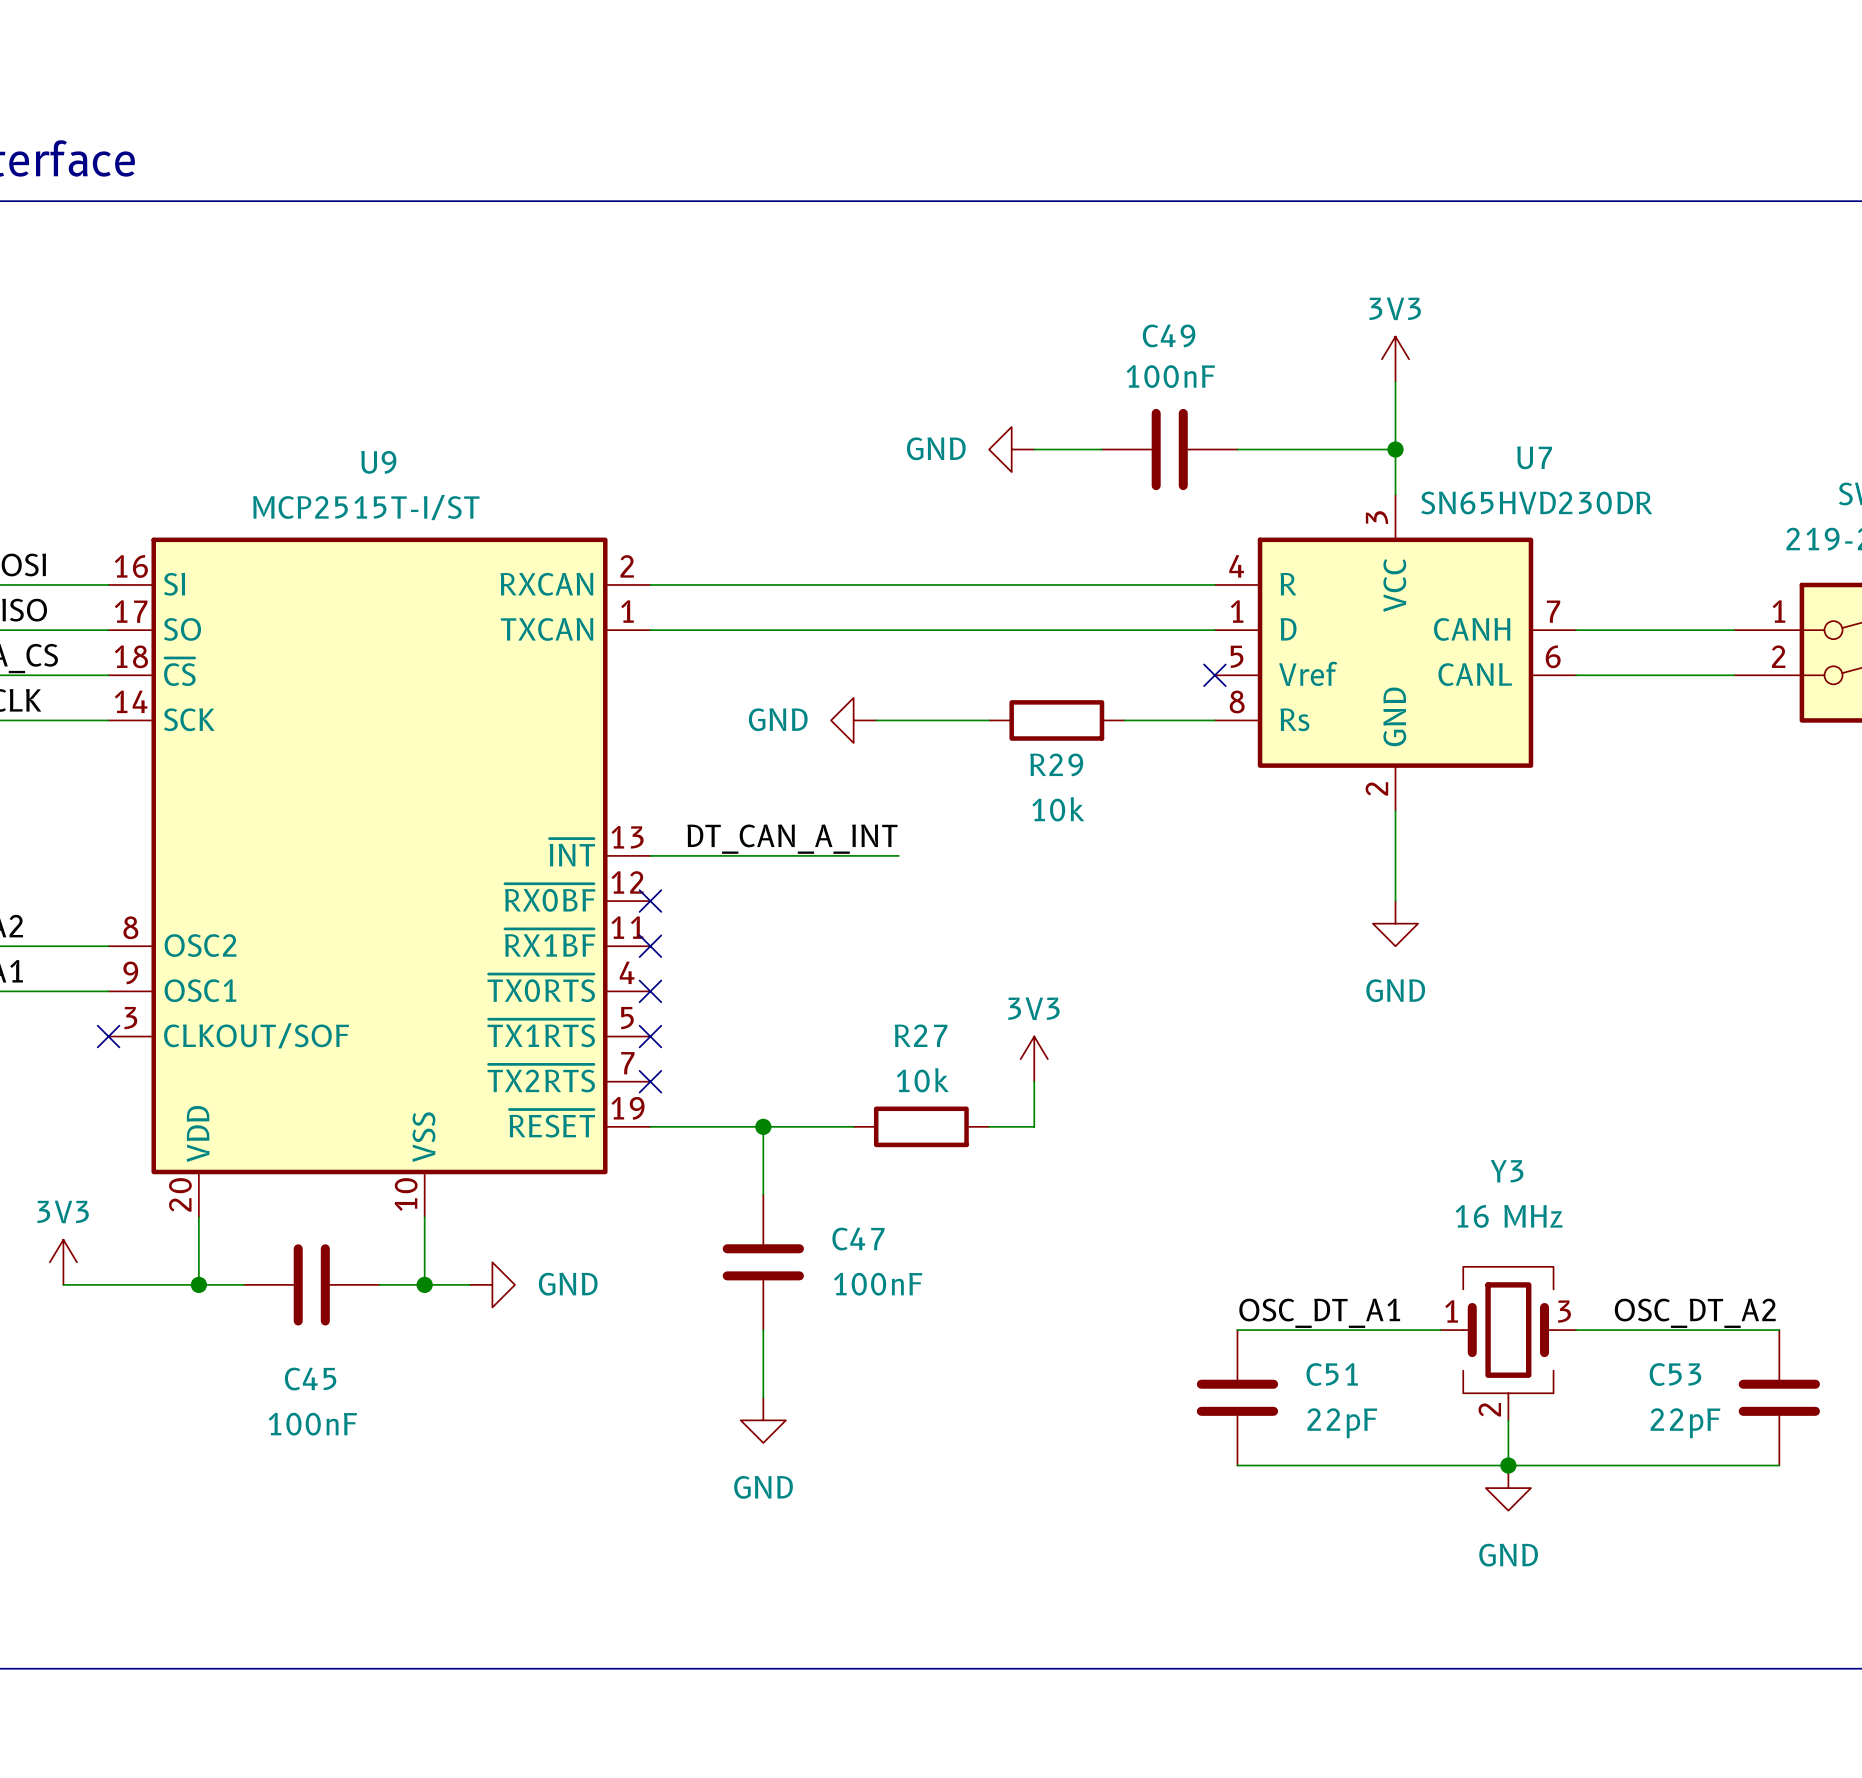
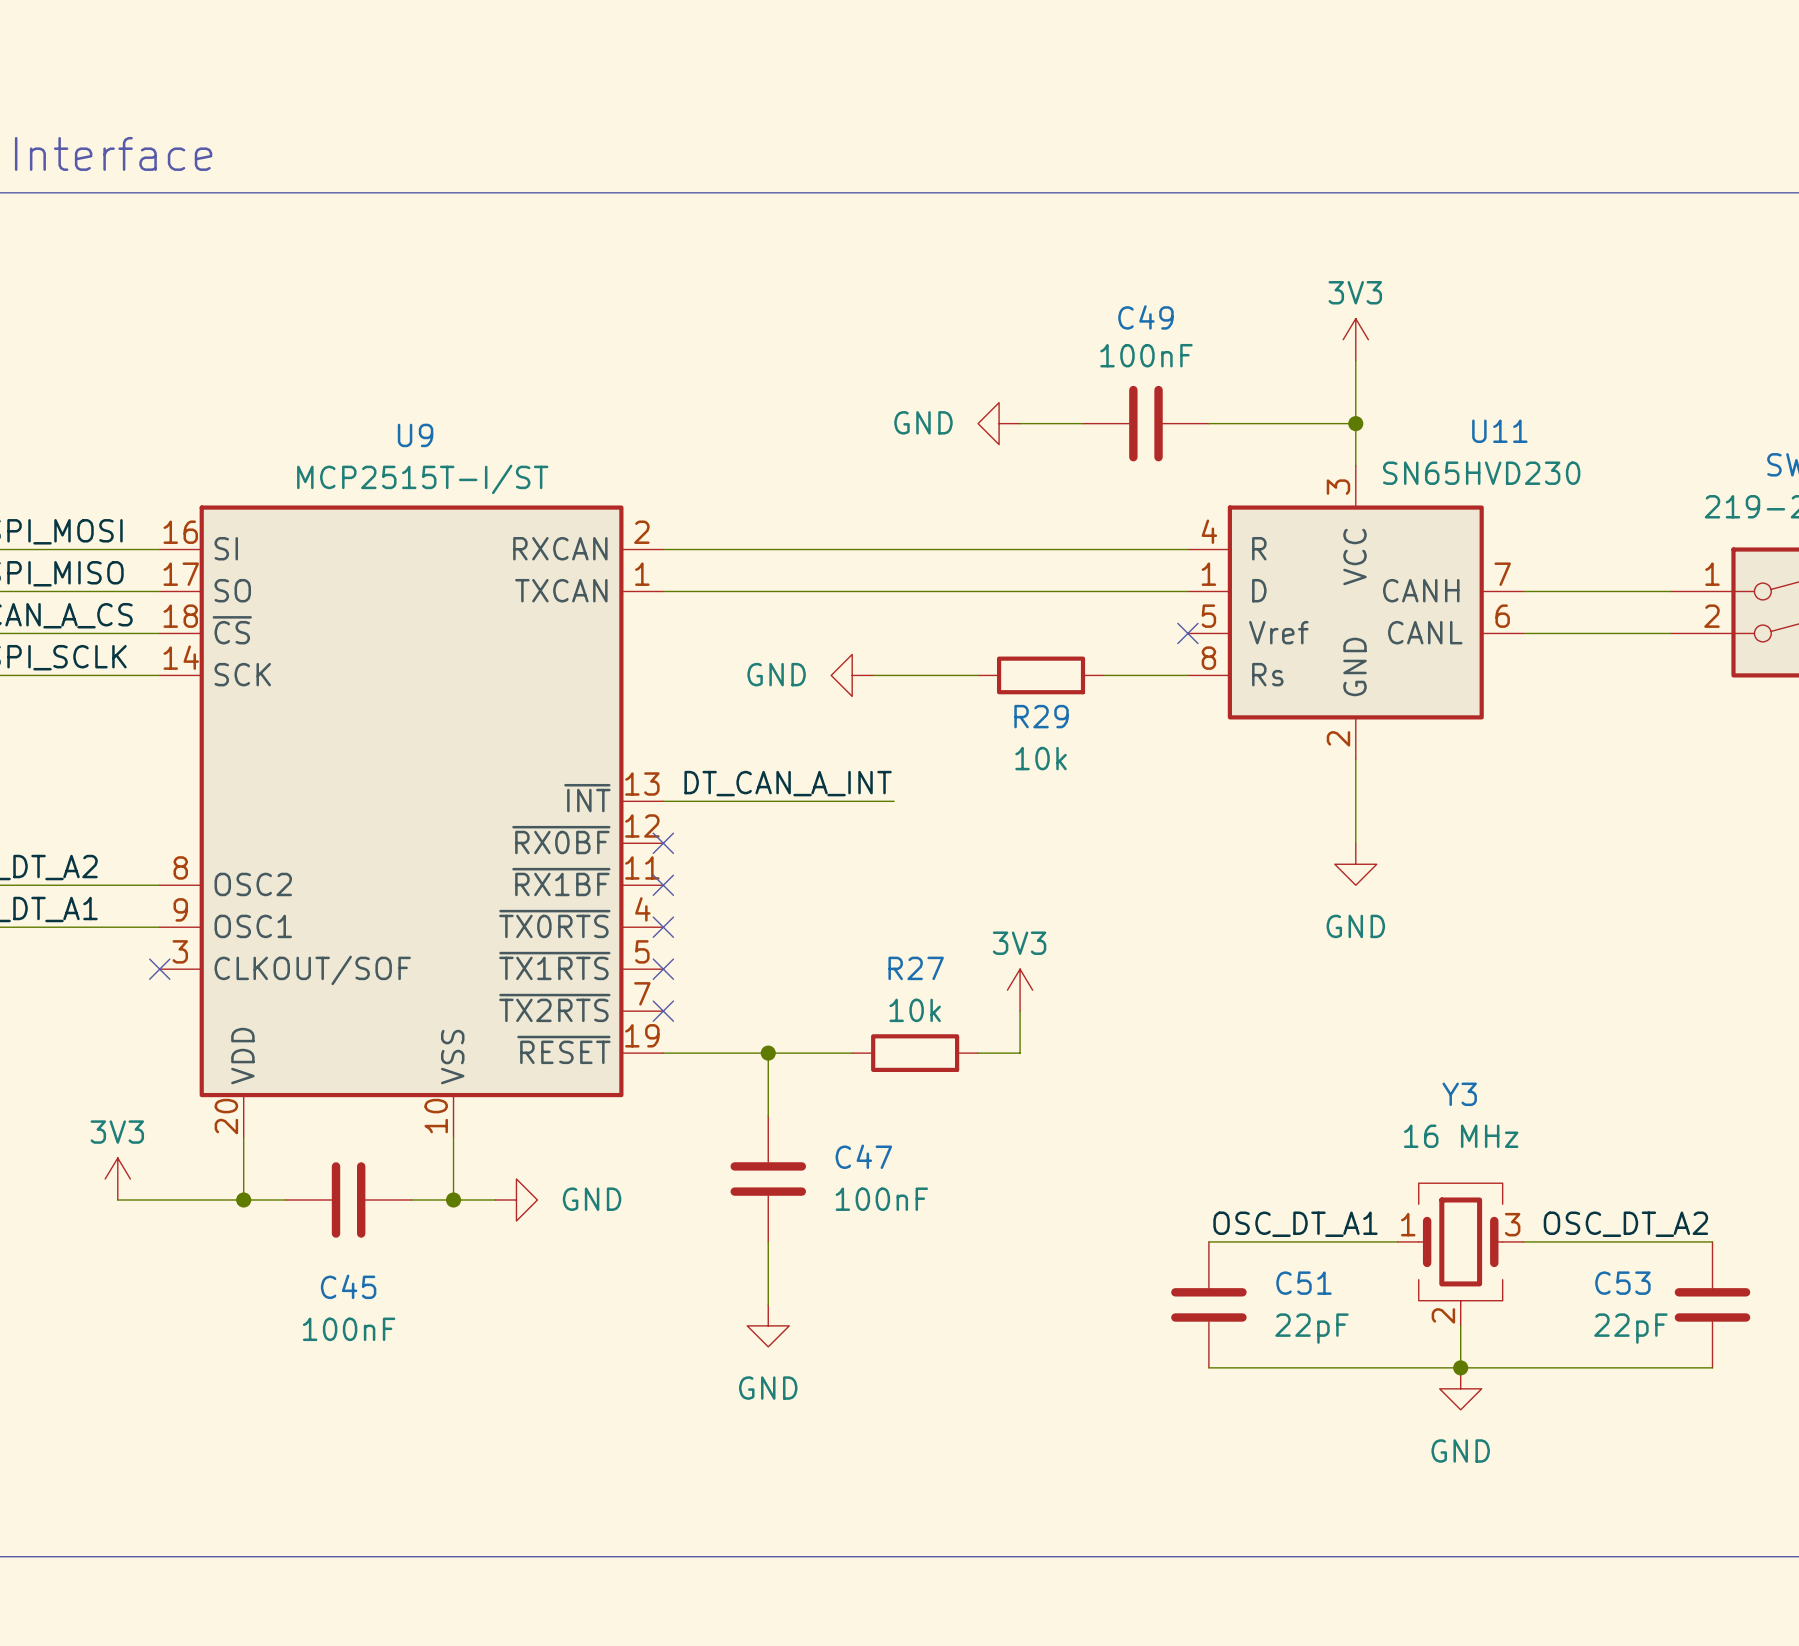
U7 name: U7 (1534, 457) -> U11 (1499, 431)
U7 value: SN65HVD230DR (1536, 503) -> SN65HVD230 (1481, 473)

